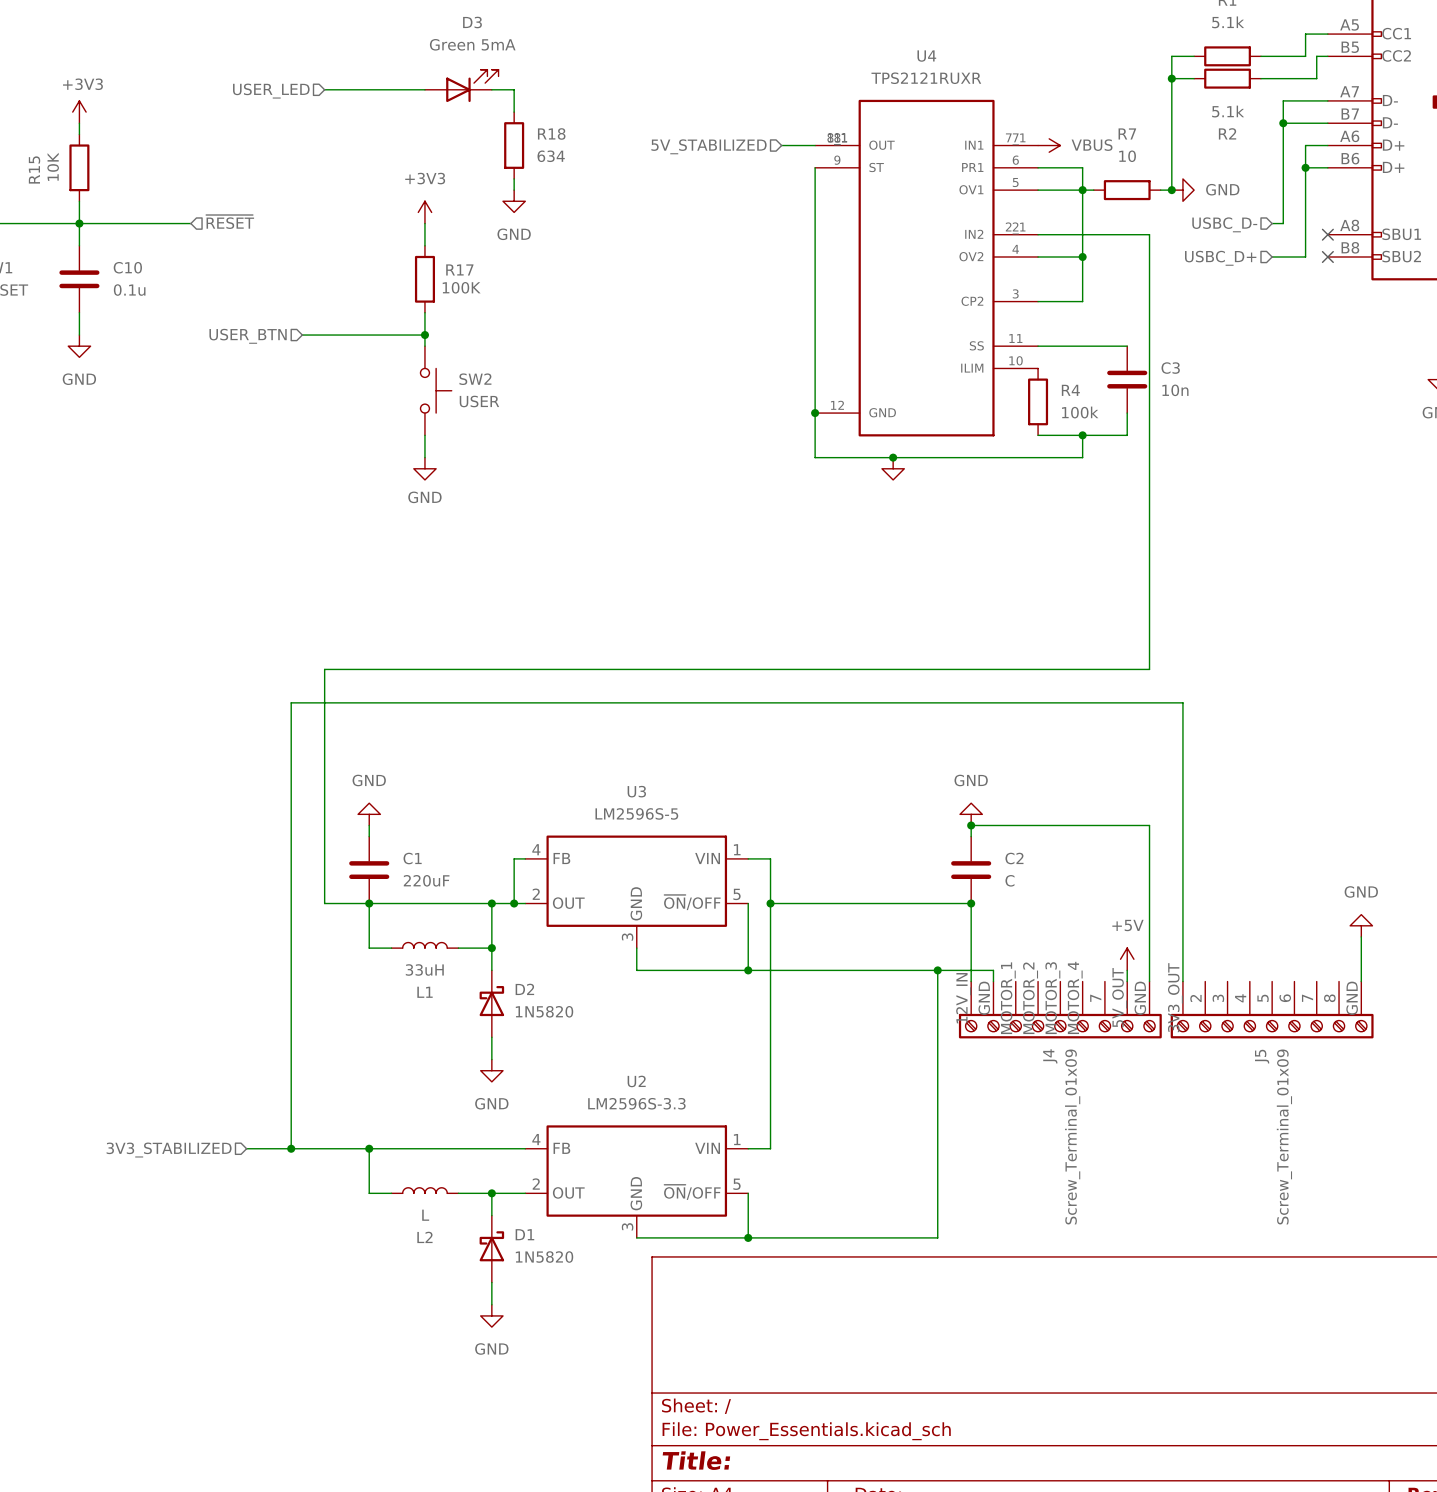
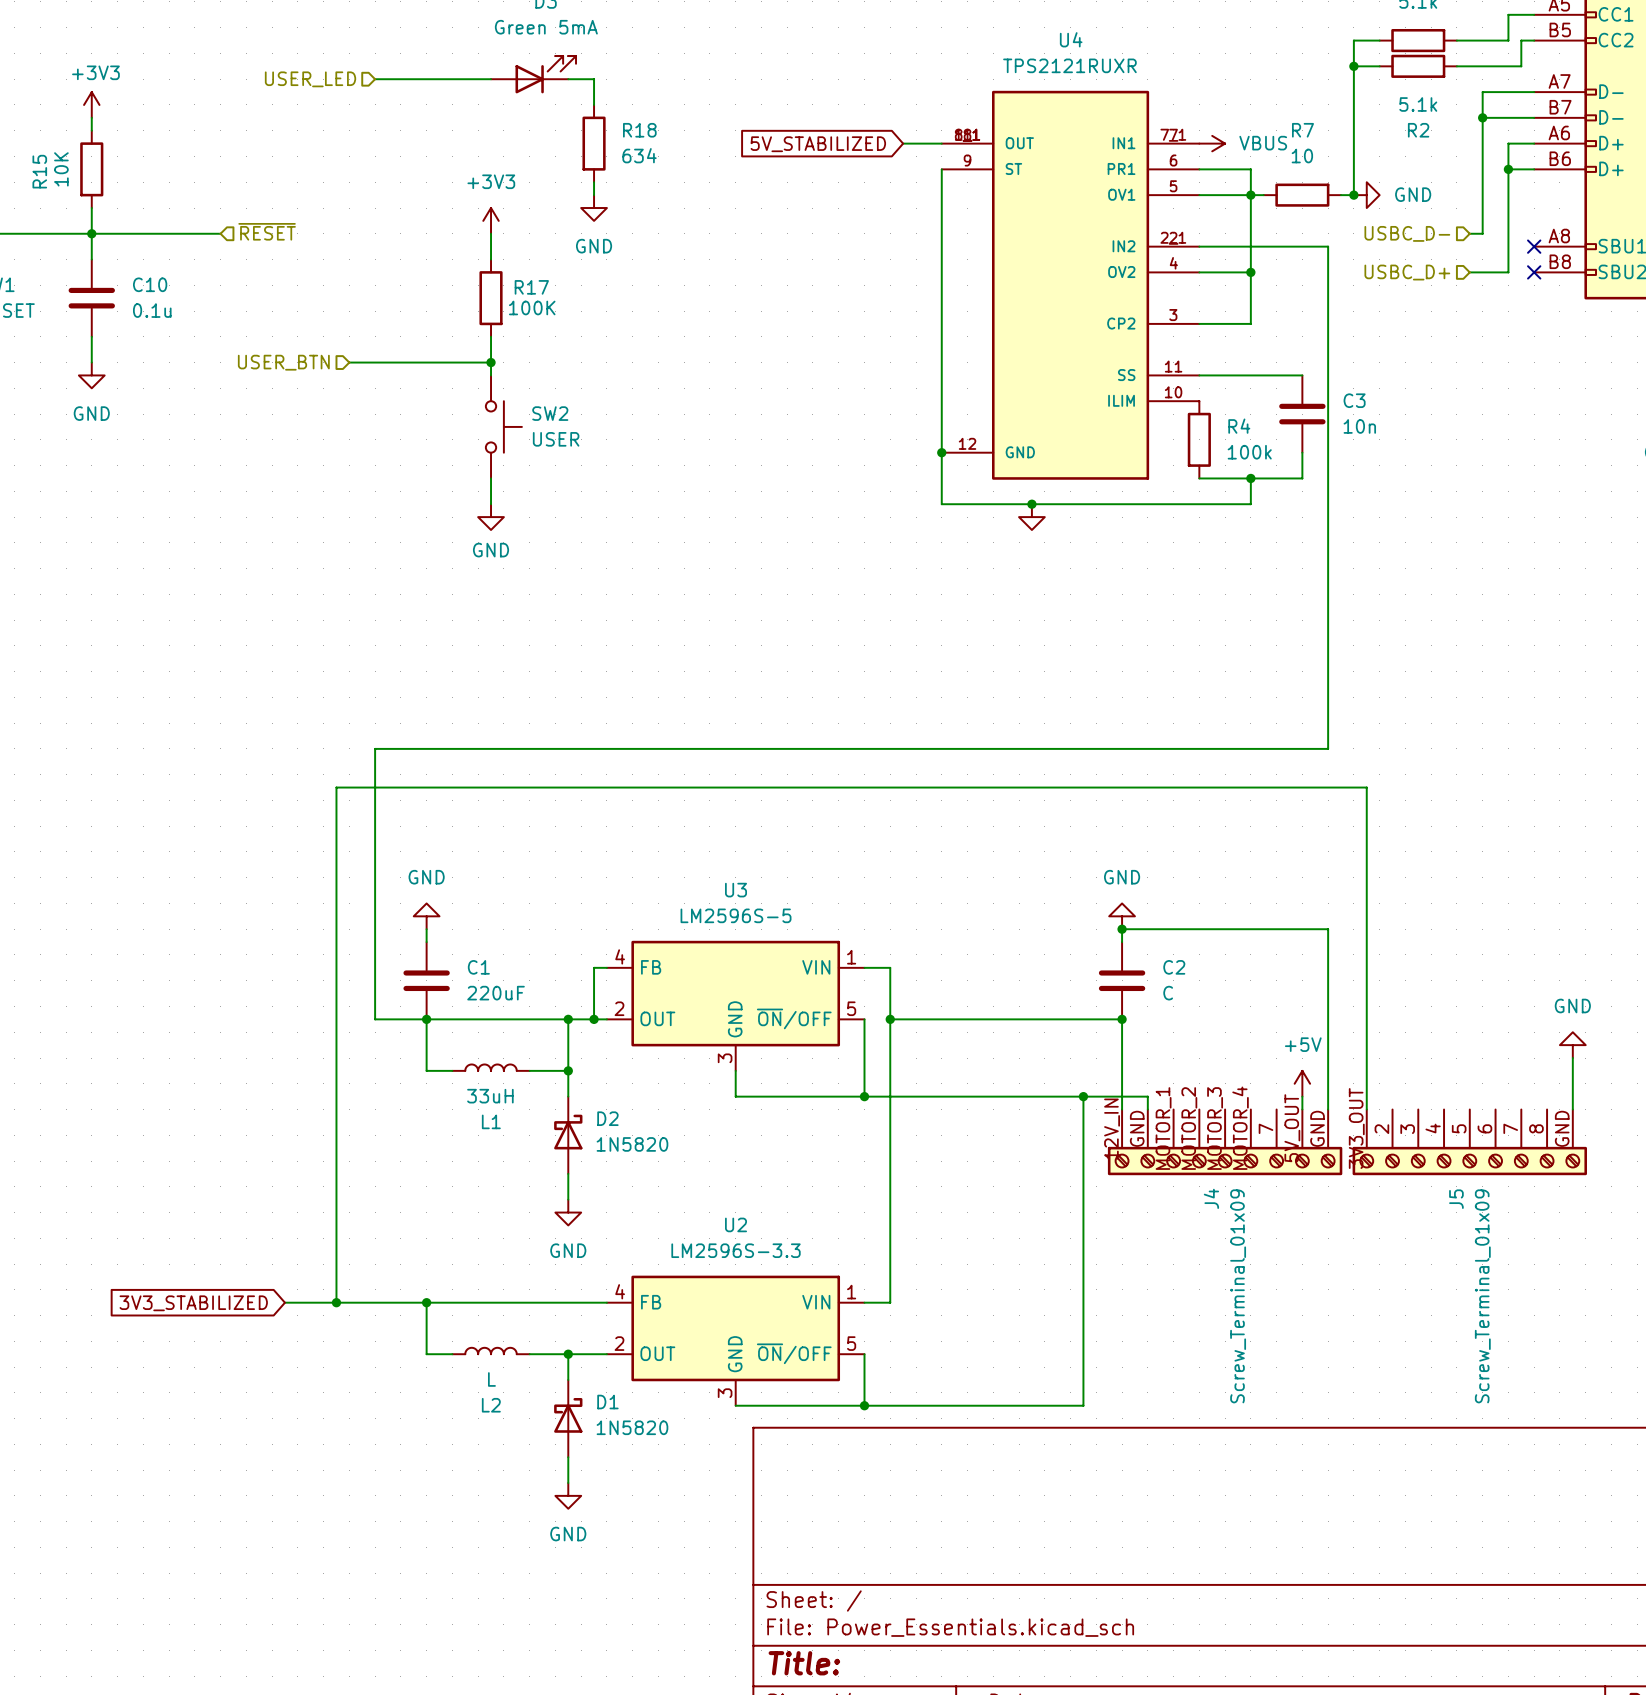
hierarchical label: 5V_STABILIZED (709, 146) -> none
global label: none -> 5V_STABILIZED (818, 144)
hierarchical label: 3V3_STABILIZED (169, 1150) -> none
global label: none -> 3V3_STABILIZED (193, 1303)

